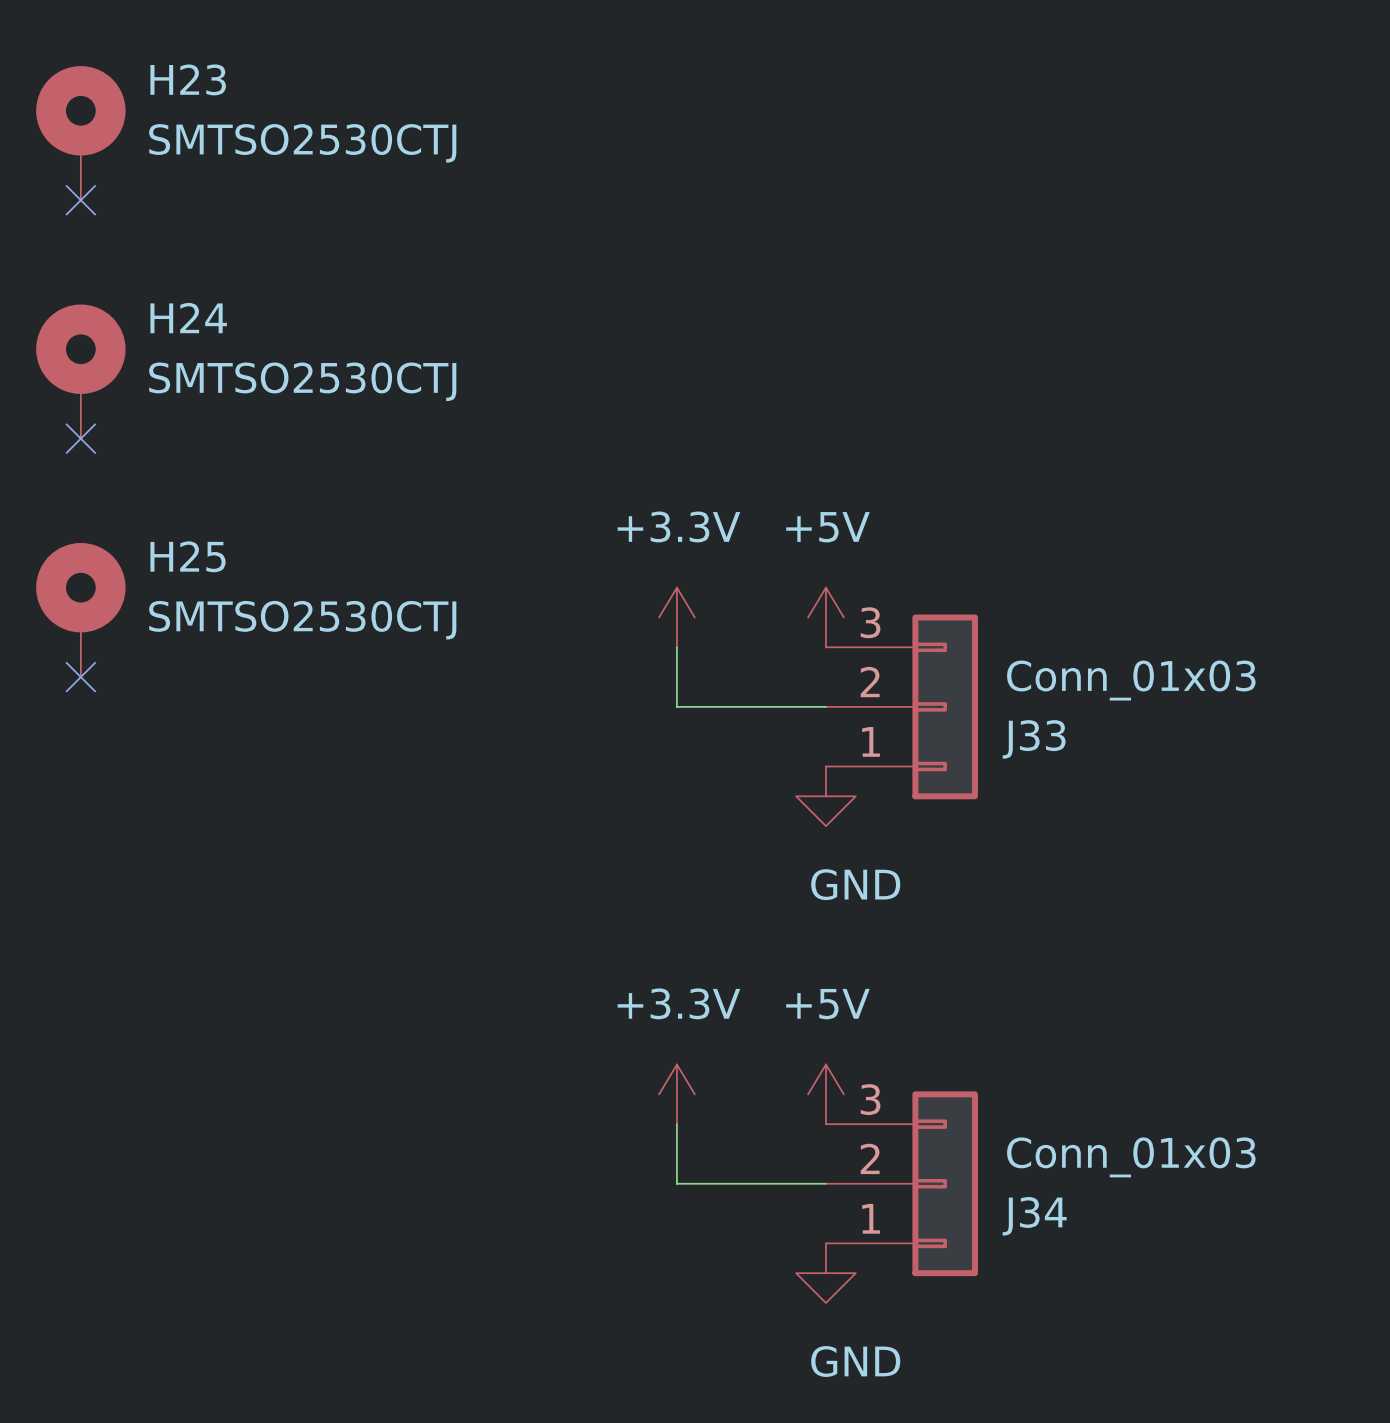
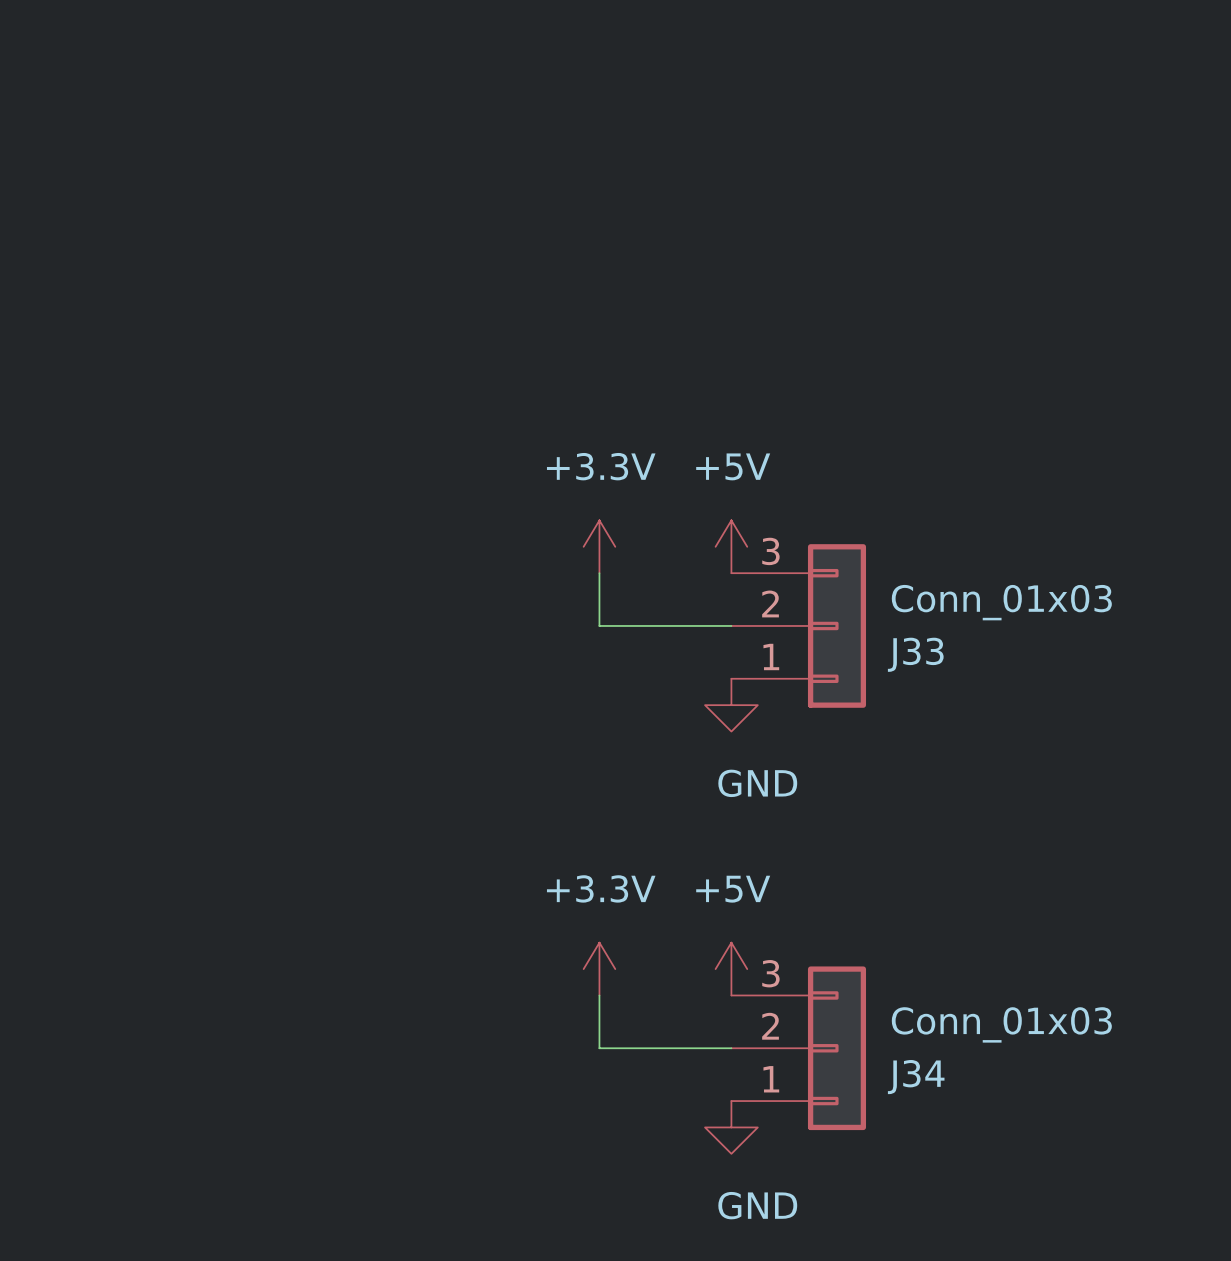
H23: SMTSO2530CTJ (80, 133) -> none
no-connect mark: (80, 200) -> none
H24: SMTSO2530CTJ (80, 371) -> none
no-connect mark: (80, 438) -> none
H25: SMTSO2530CTJ (80, 610) -> none
no-connect mark: (80, 677) -> none

